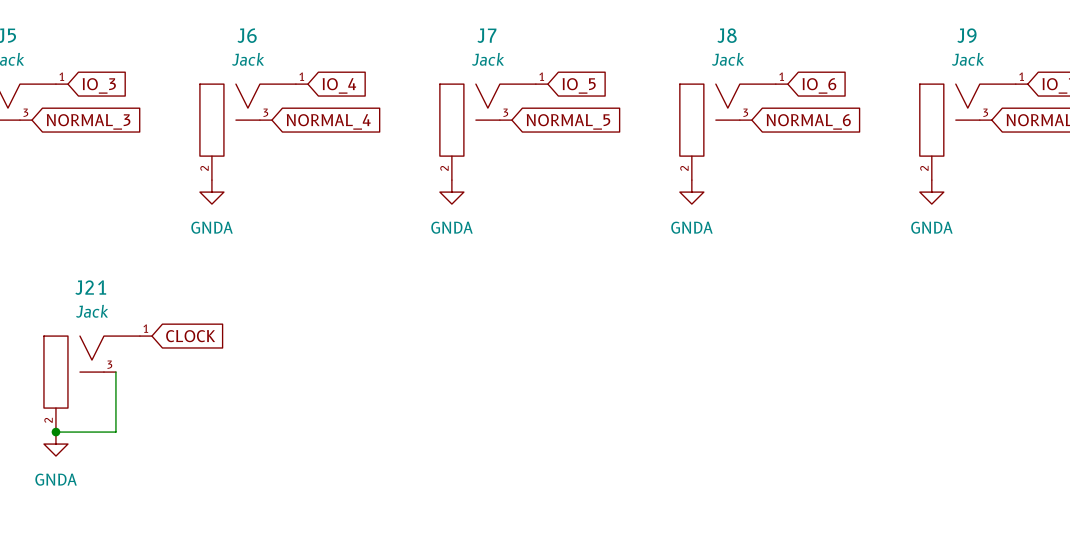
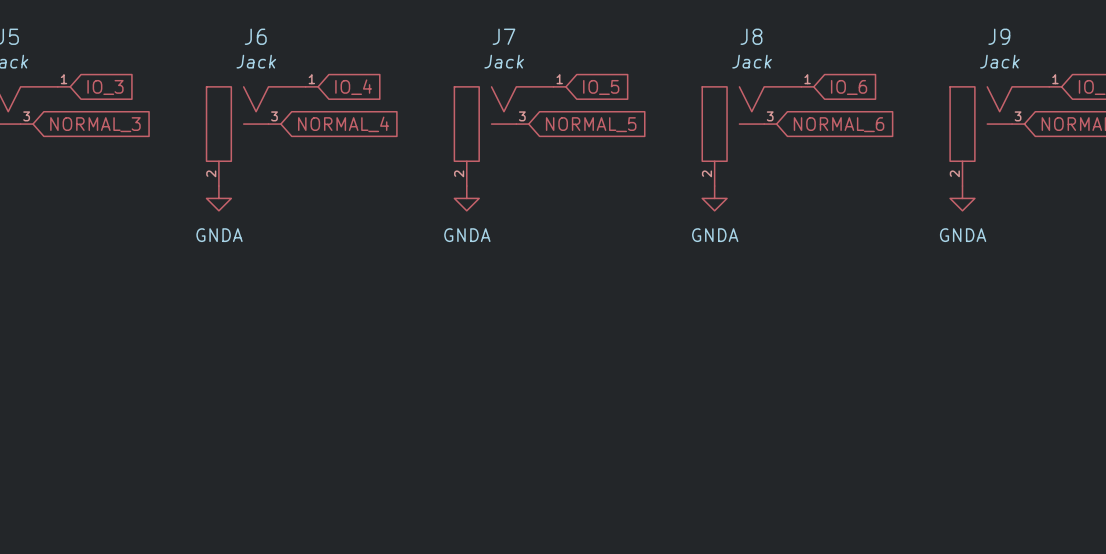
global label: CLOCK (190, 336) -> none
wire: (115, 372) (115, 432) (55, 432) -> none
J21: (97, 384) -> none
junction: (55, 432) -> none
power symbol: GNDA (55, 444) -> none

